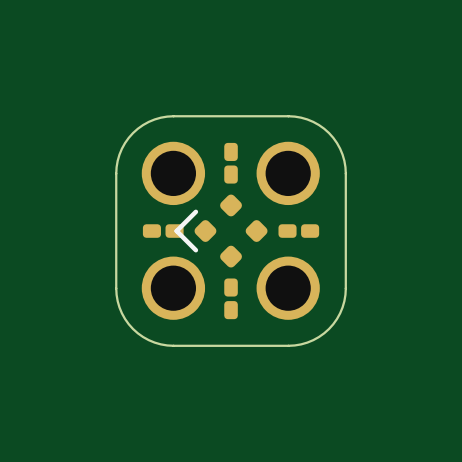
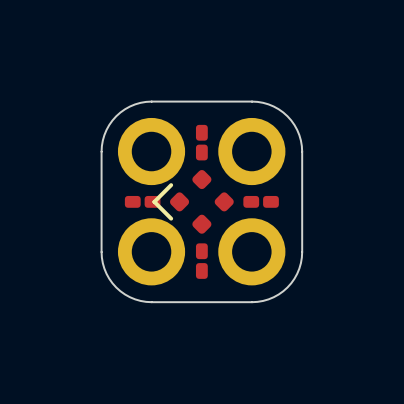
part footprint: [141, 141, 320, 320] -> [117, 117, 286, 286]

